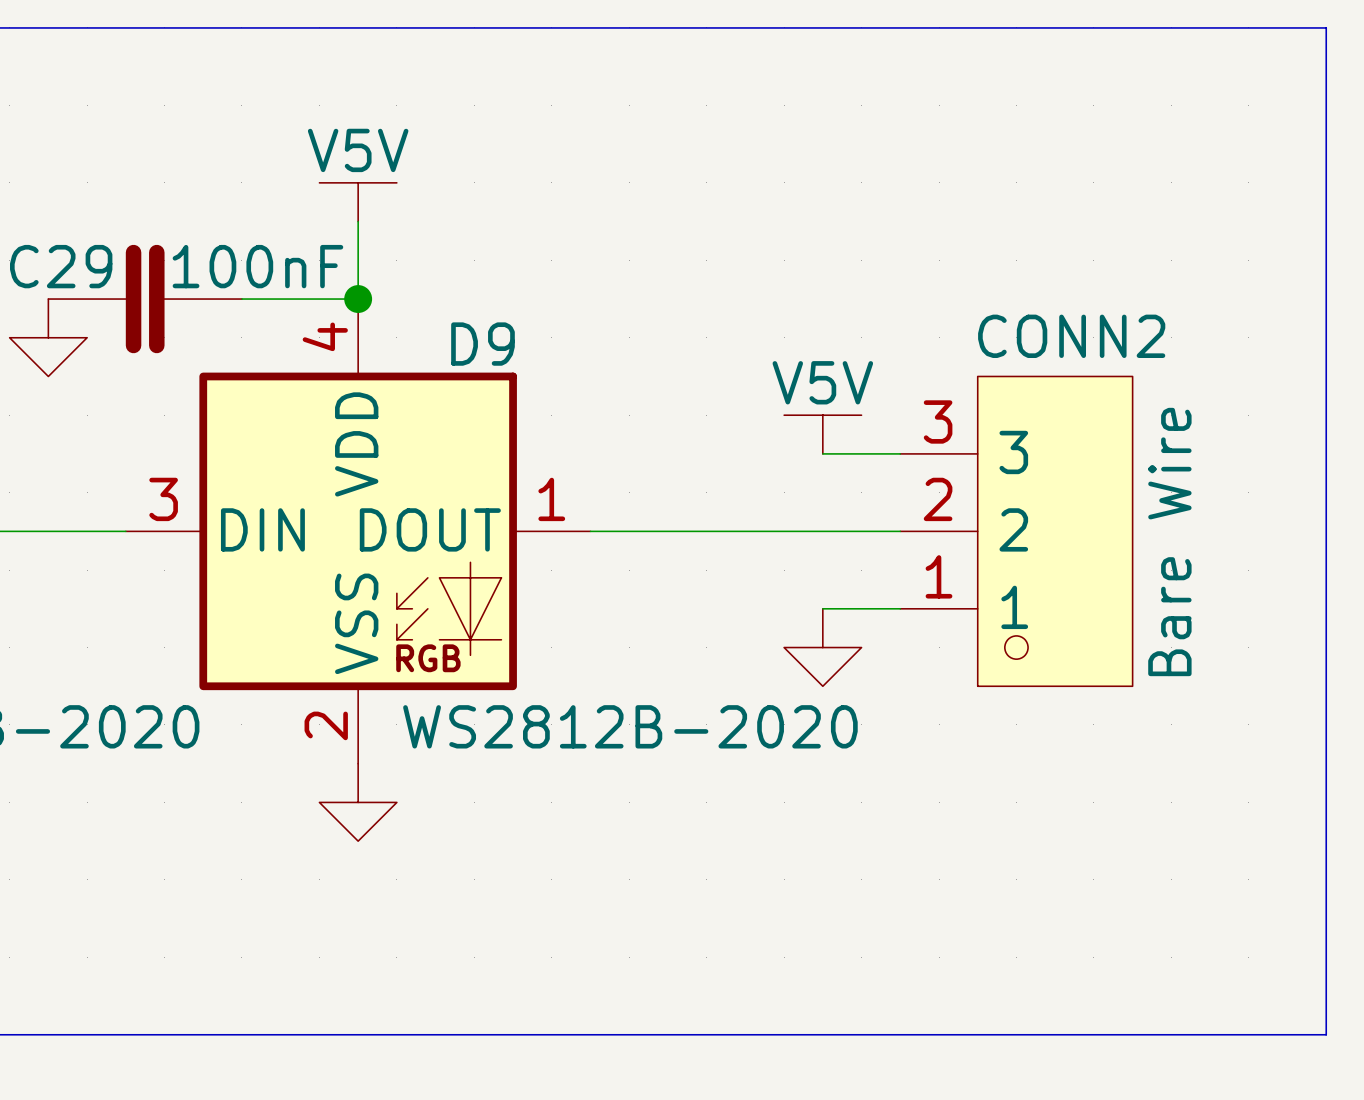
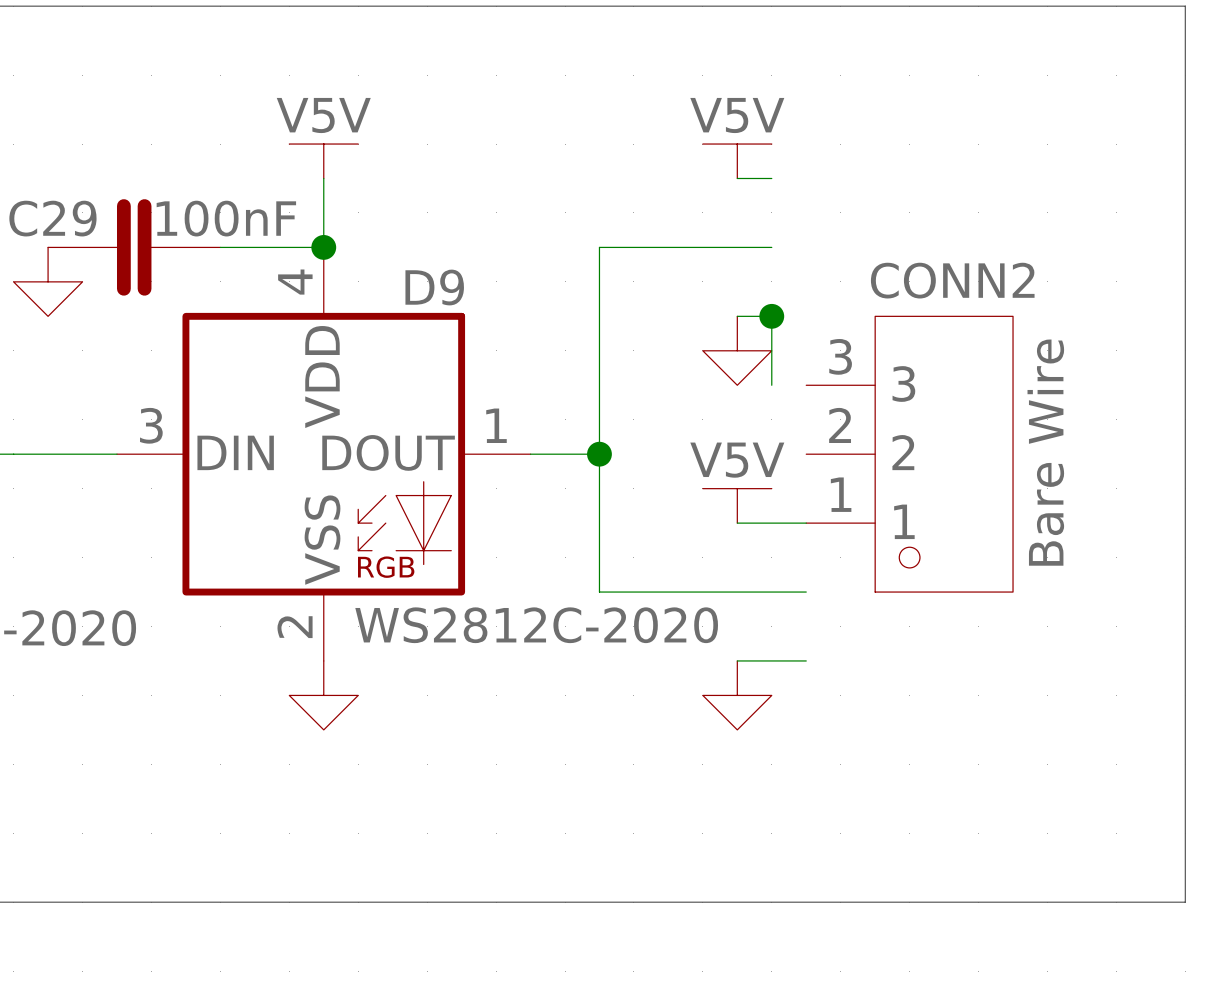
power symbol: none -> V5V (737, 161)
wire: none -> (737, 178) (771, 178)
wire: none -> (771, 247) (599, 247) (599, 592) (806, 592)
wire: none -> (737, 316) (771, 316) (771, 385)
junction: none -> (771, 316)
power symbol text: V5V (822, 382) -> none
power symbol shape: [784, 415, 862, 454] -> [702, 316, 772, 386]
wire: (822, 453) (900, 453) -> (737, 660) (806, 660)
wire: (667, 531) (900, 531) -> none
junction: none -> (599, 454)
power symbol: none -> V5V (737, 505)
power symbol position: (822, 647) -> (737, 695)
D9 value: WS2812B-2020 (630, 726) -> WS2812C-2020 (536, 625)

